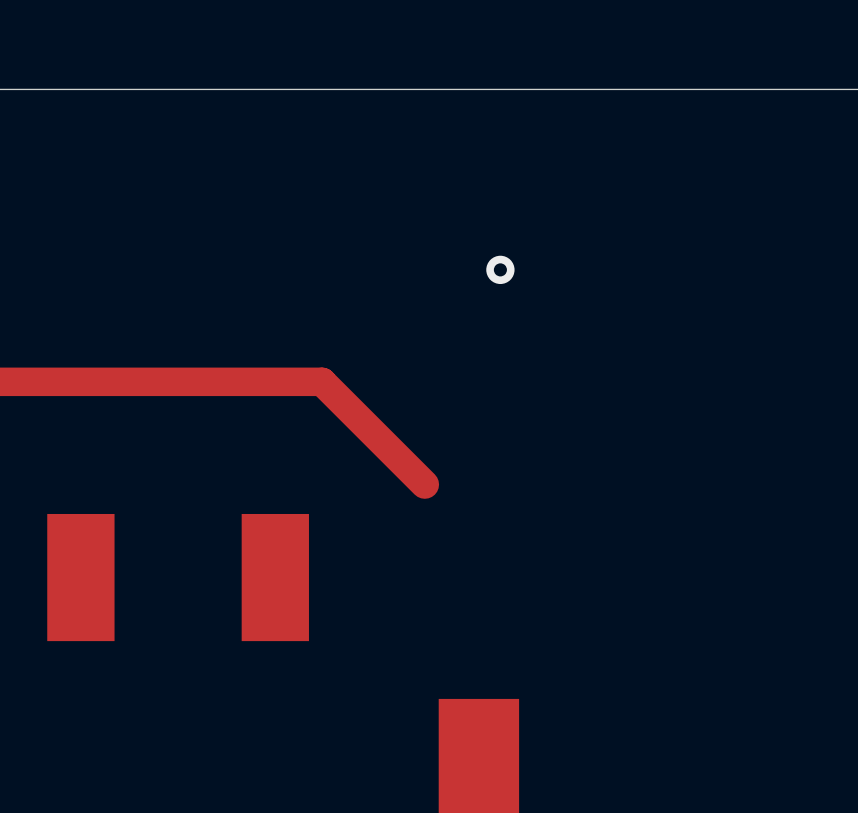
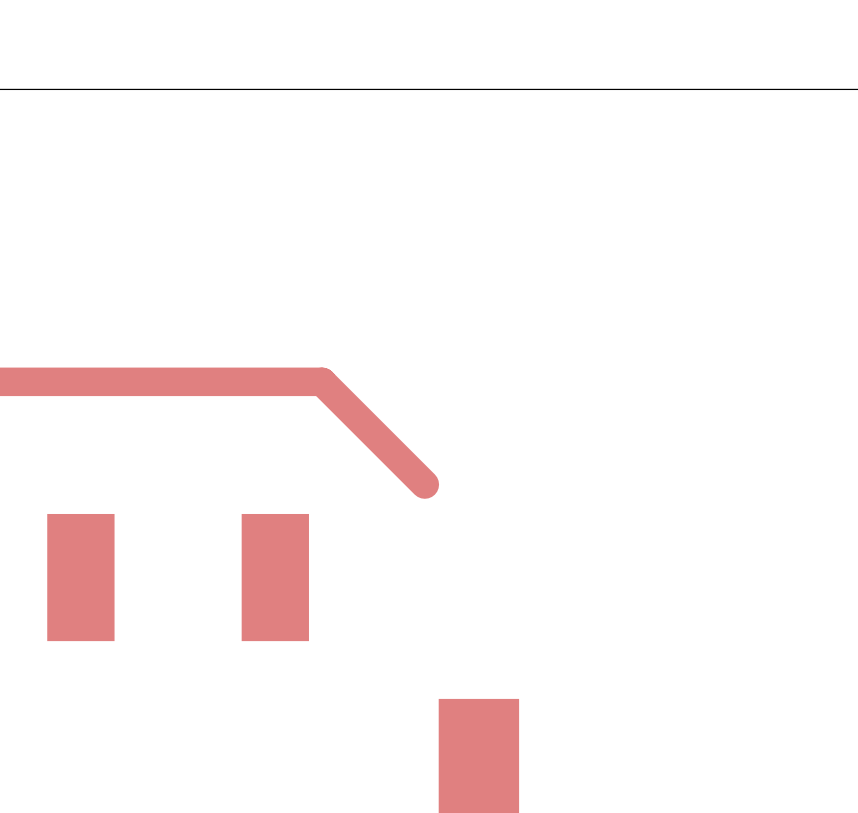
via: (500, 269) -> none

